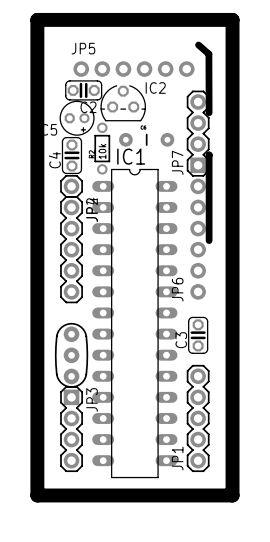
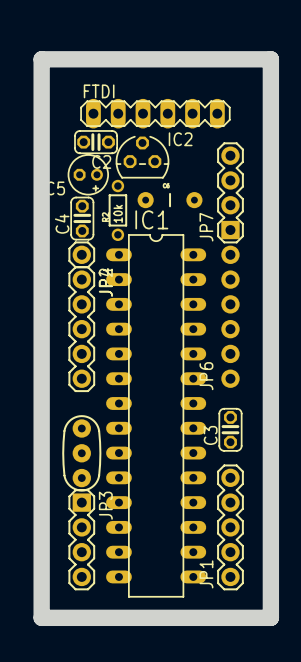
board edge: (198, 45) (208, 54) (209, 112) -> none
FTDI: none -> (155, 113)
JP5: (134, 69) -> none
board edge: (209, 155) (209, 240) -> none

